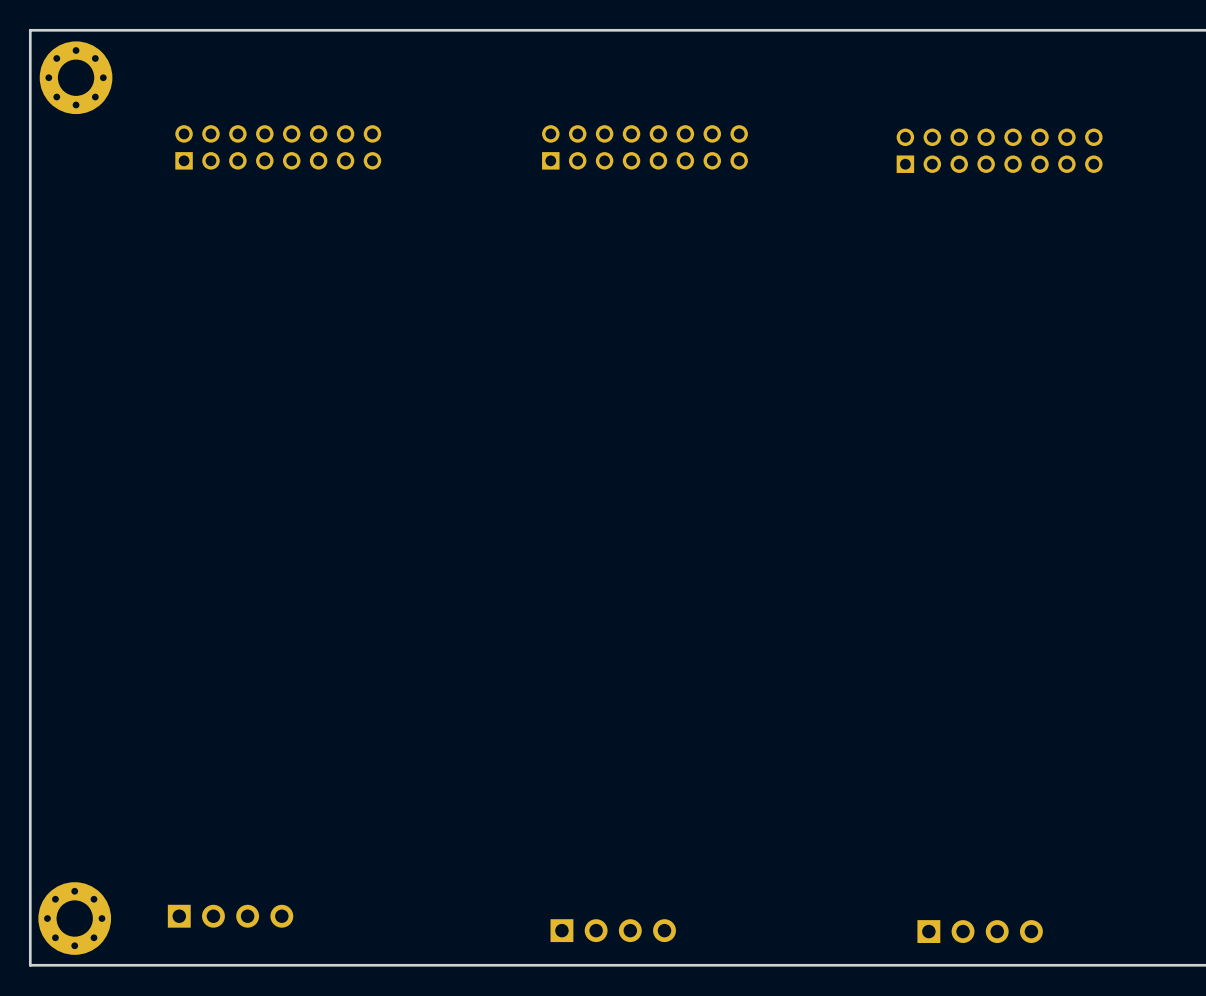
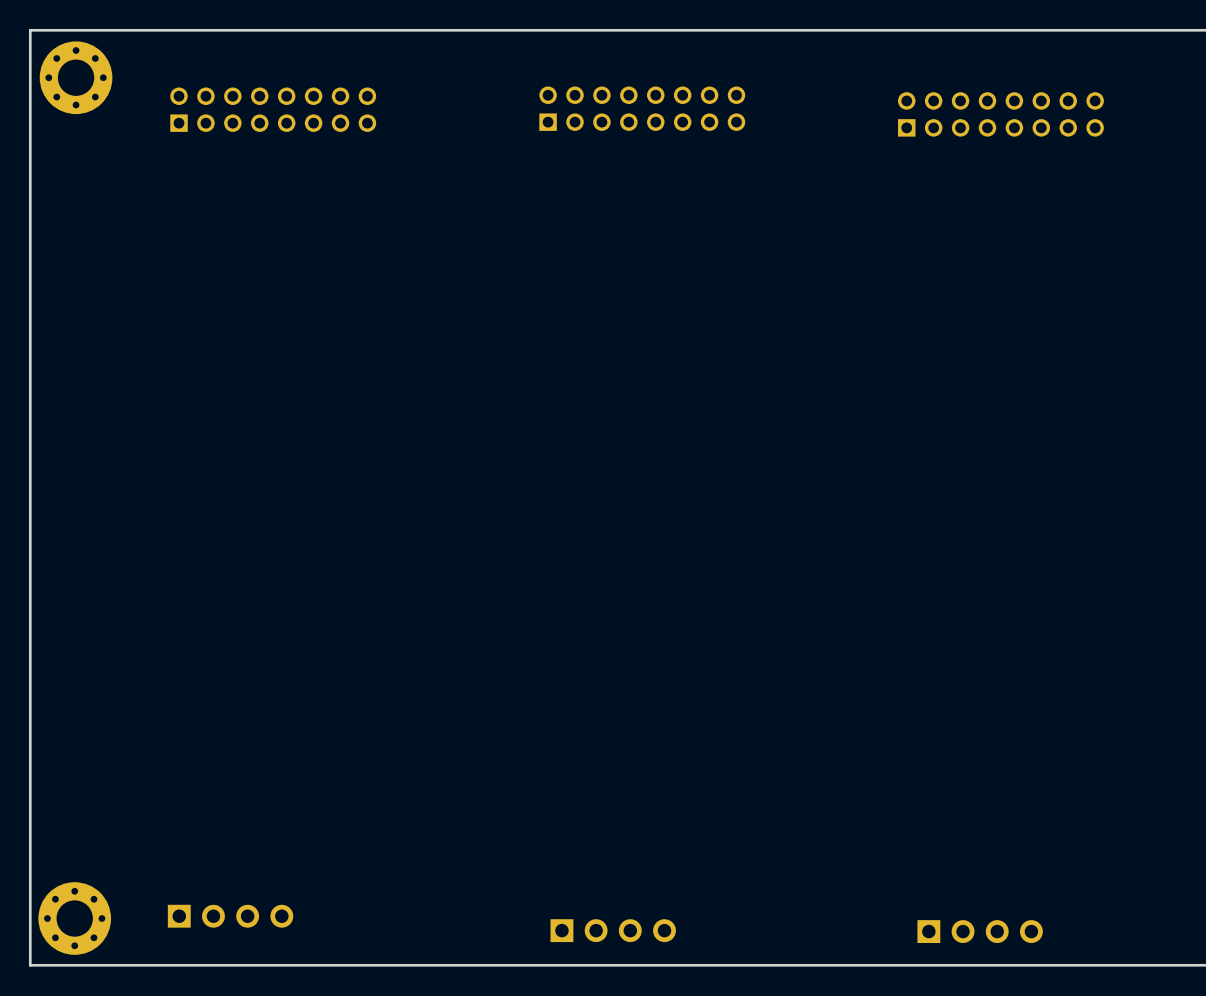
part position: (278, 147) -> (273, 109)
part position: (644, 147) -> (642, 108)
part position: (999, 150) -> (1000, 114)

